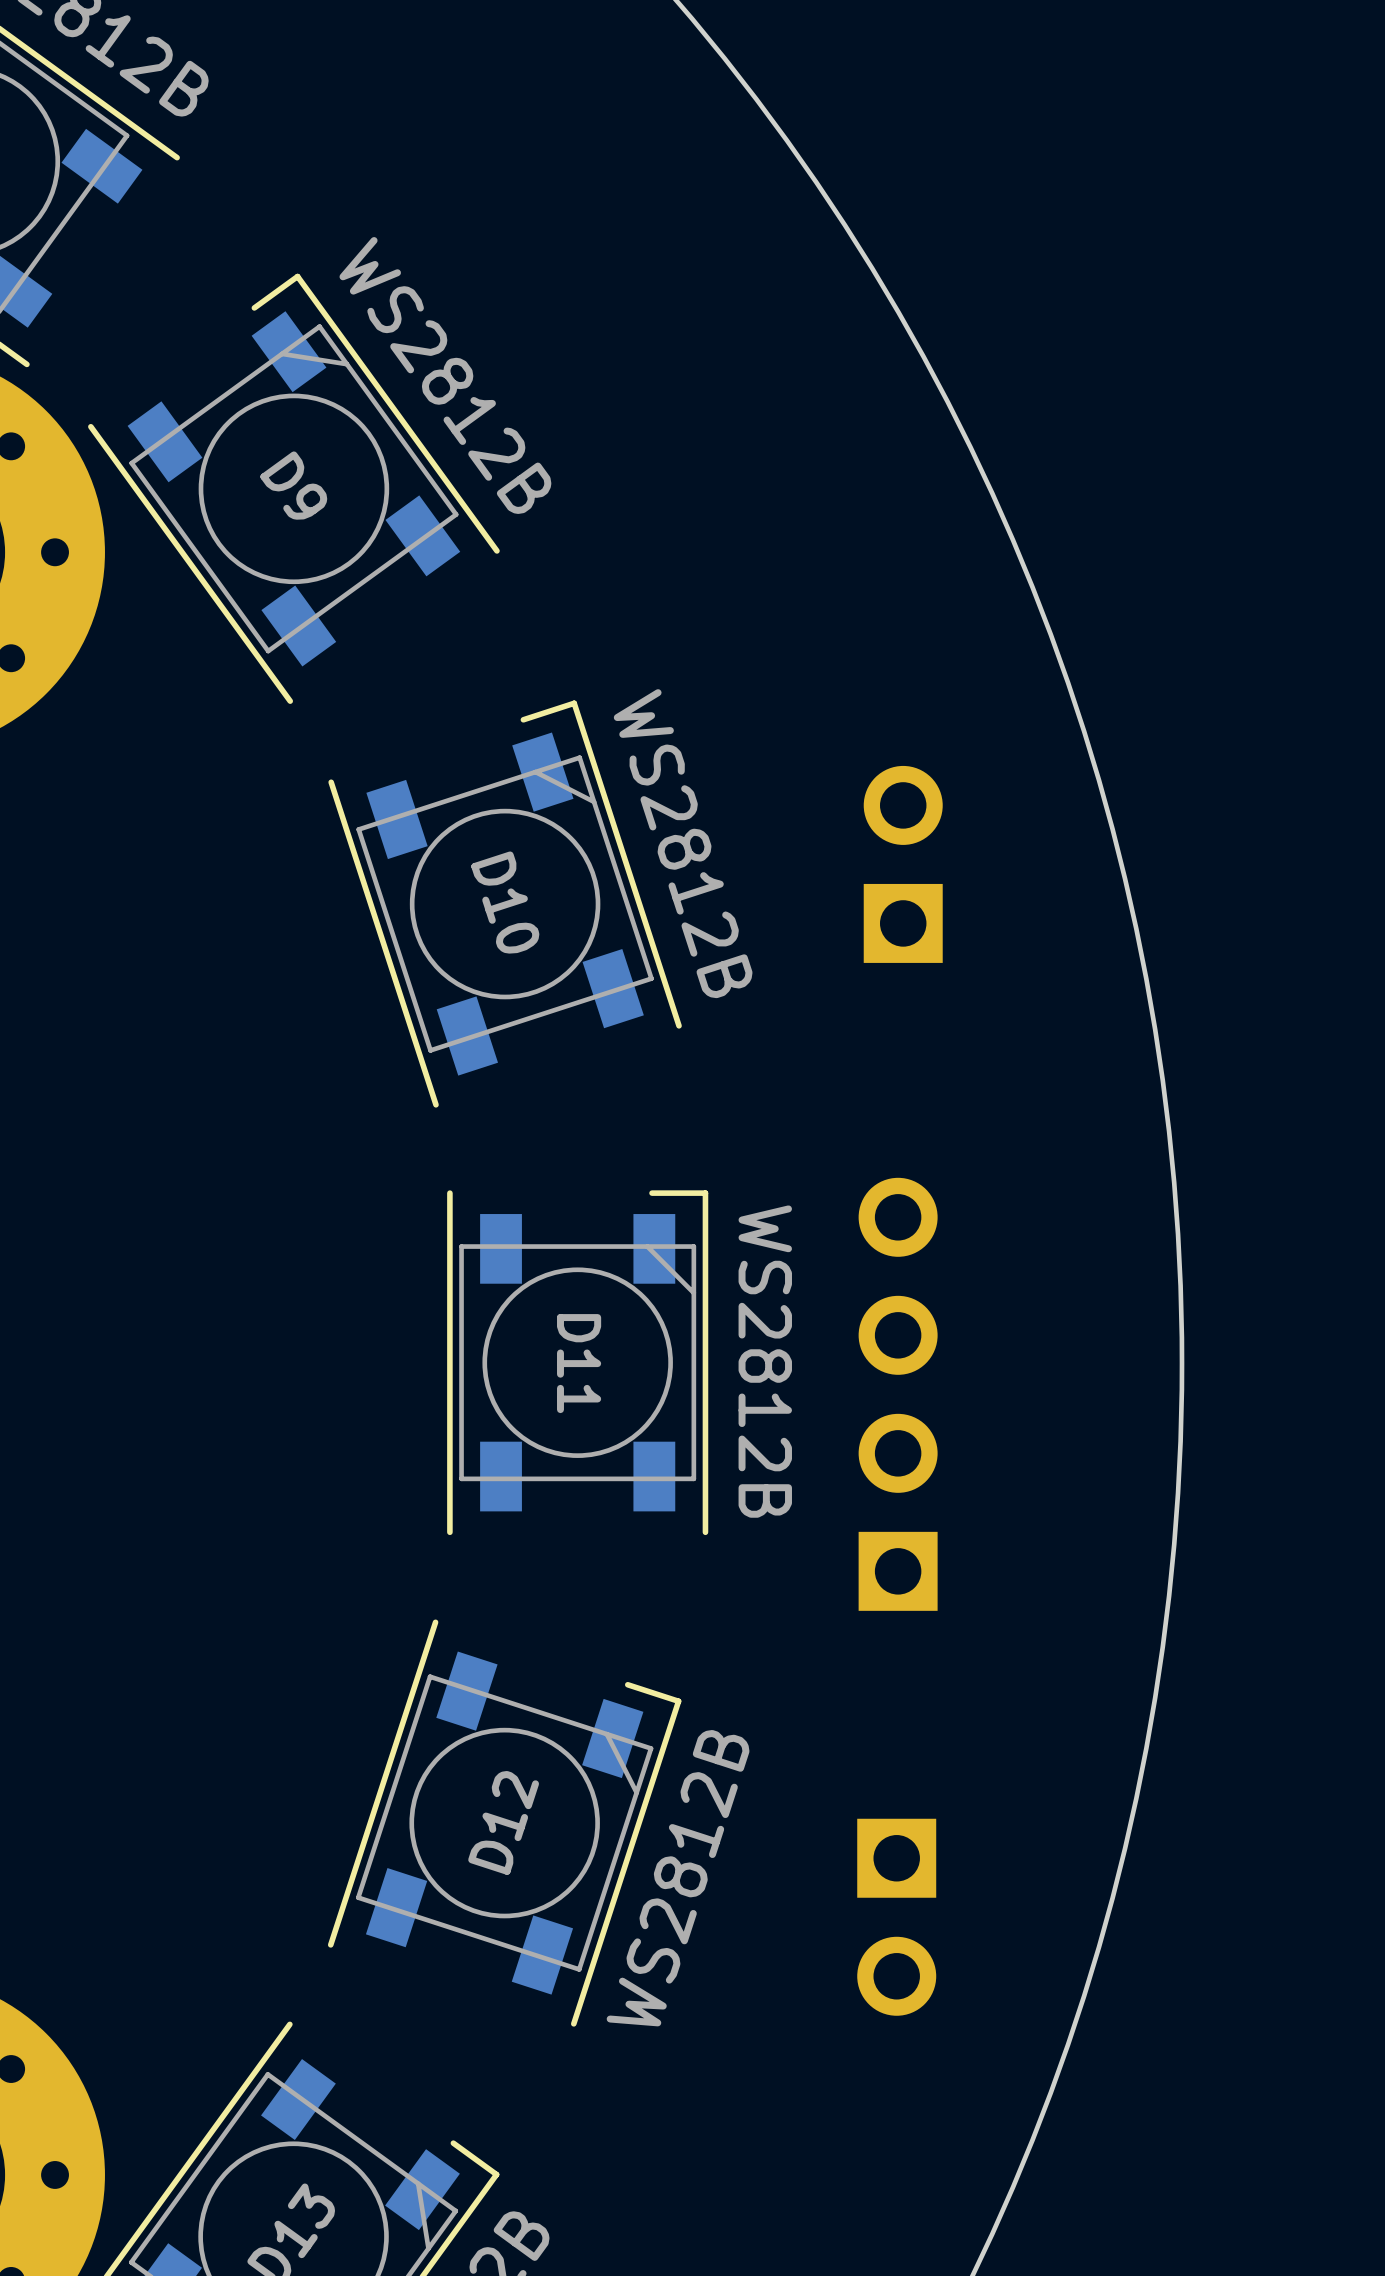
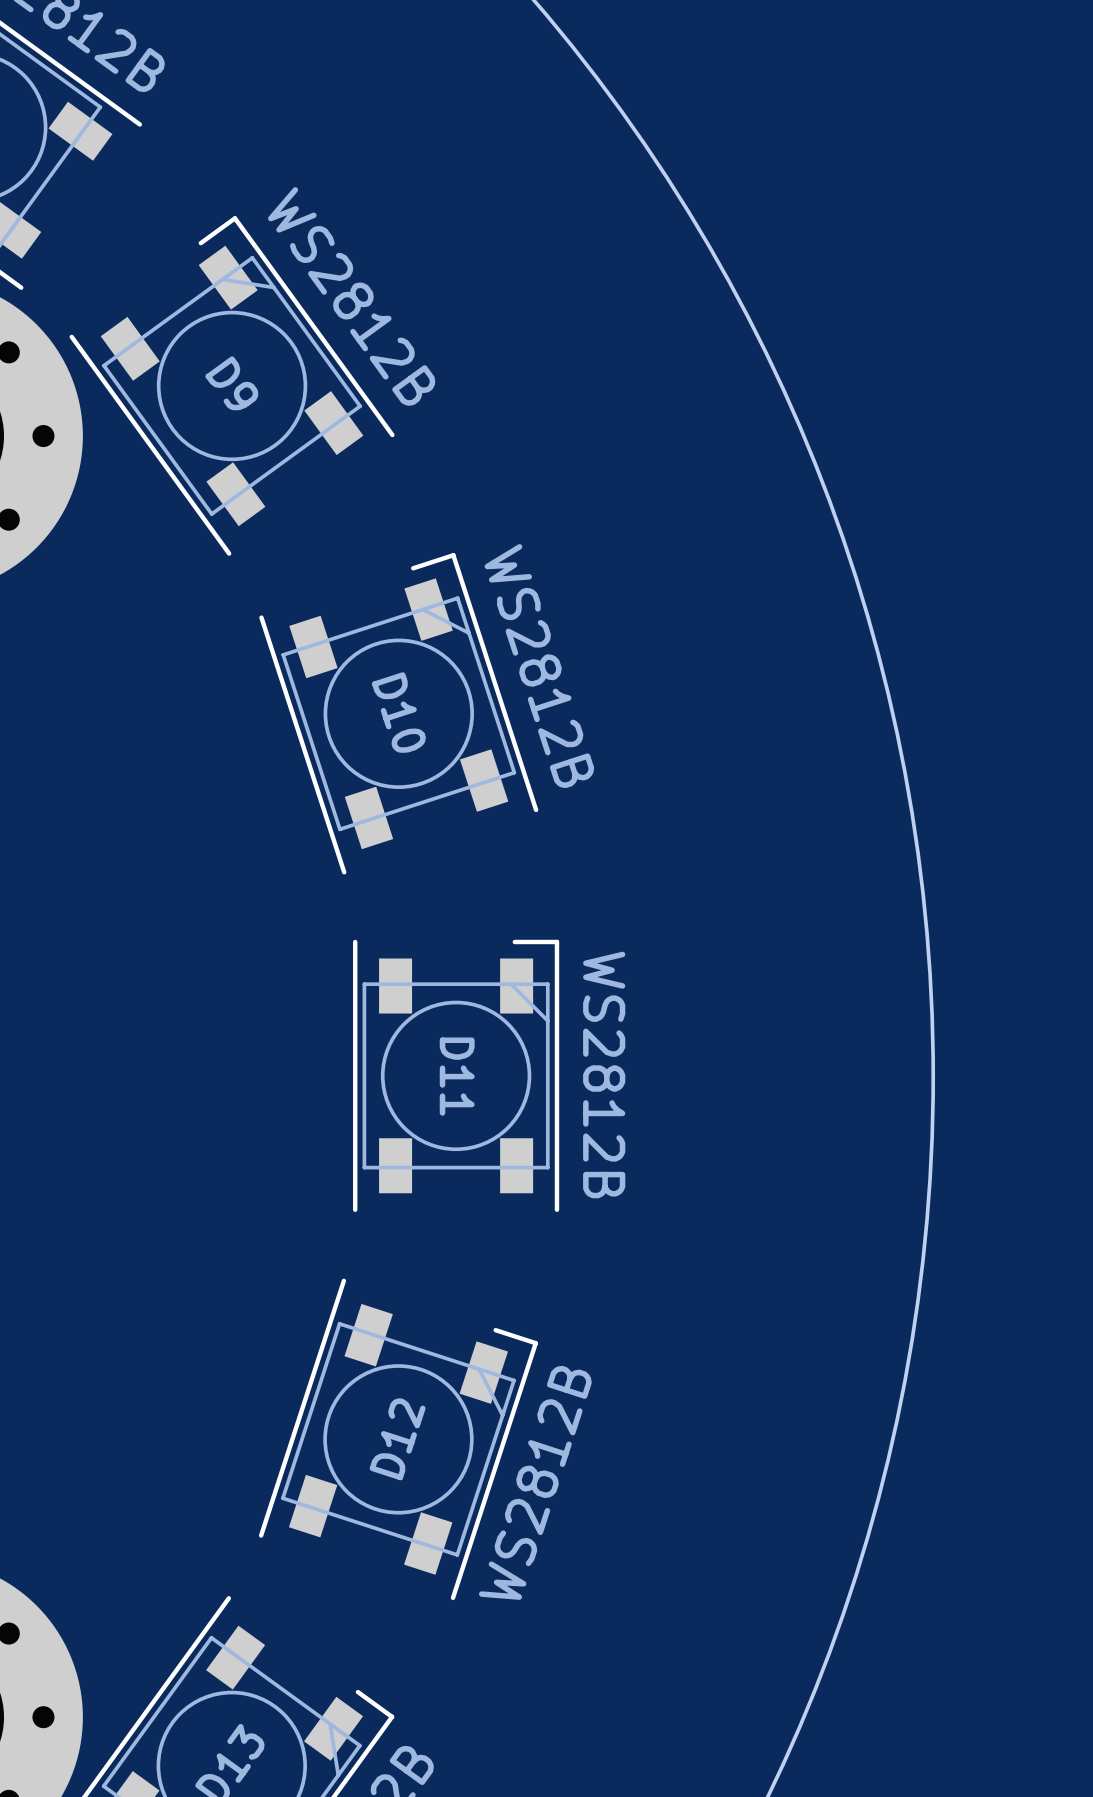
part: (903, 864) -> none
part: (898, 1394) -> none
part: (896, 1917) -> none

